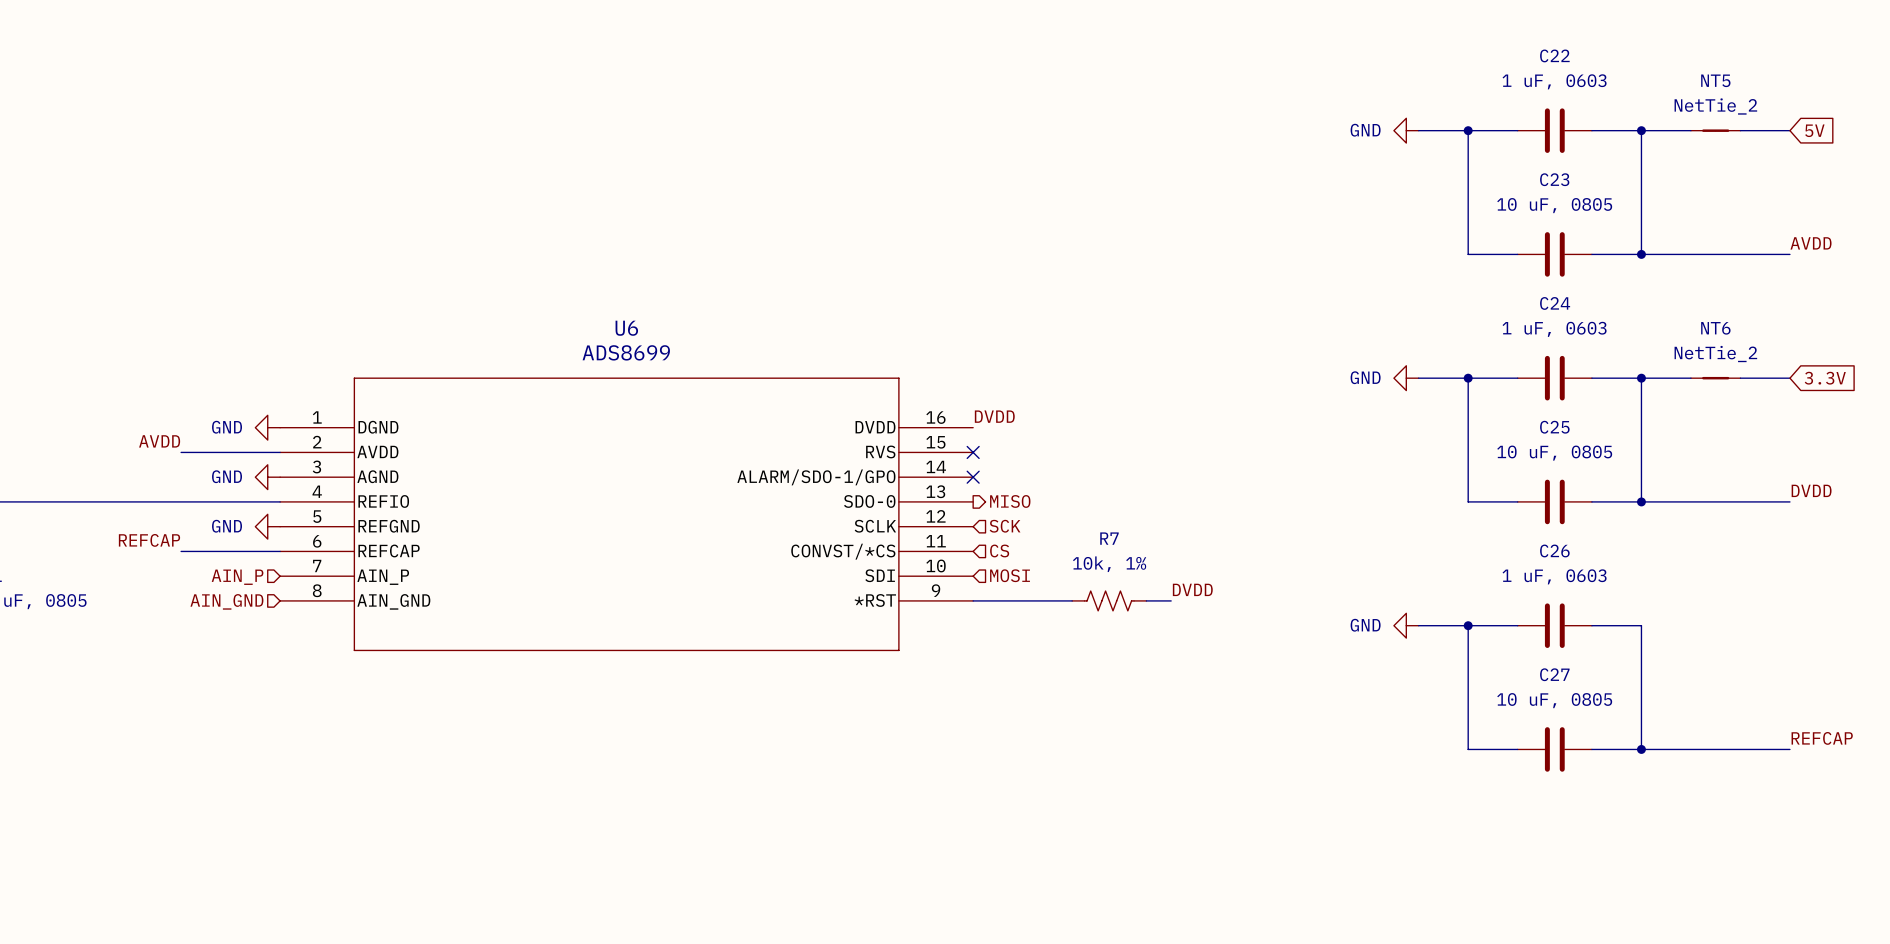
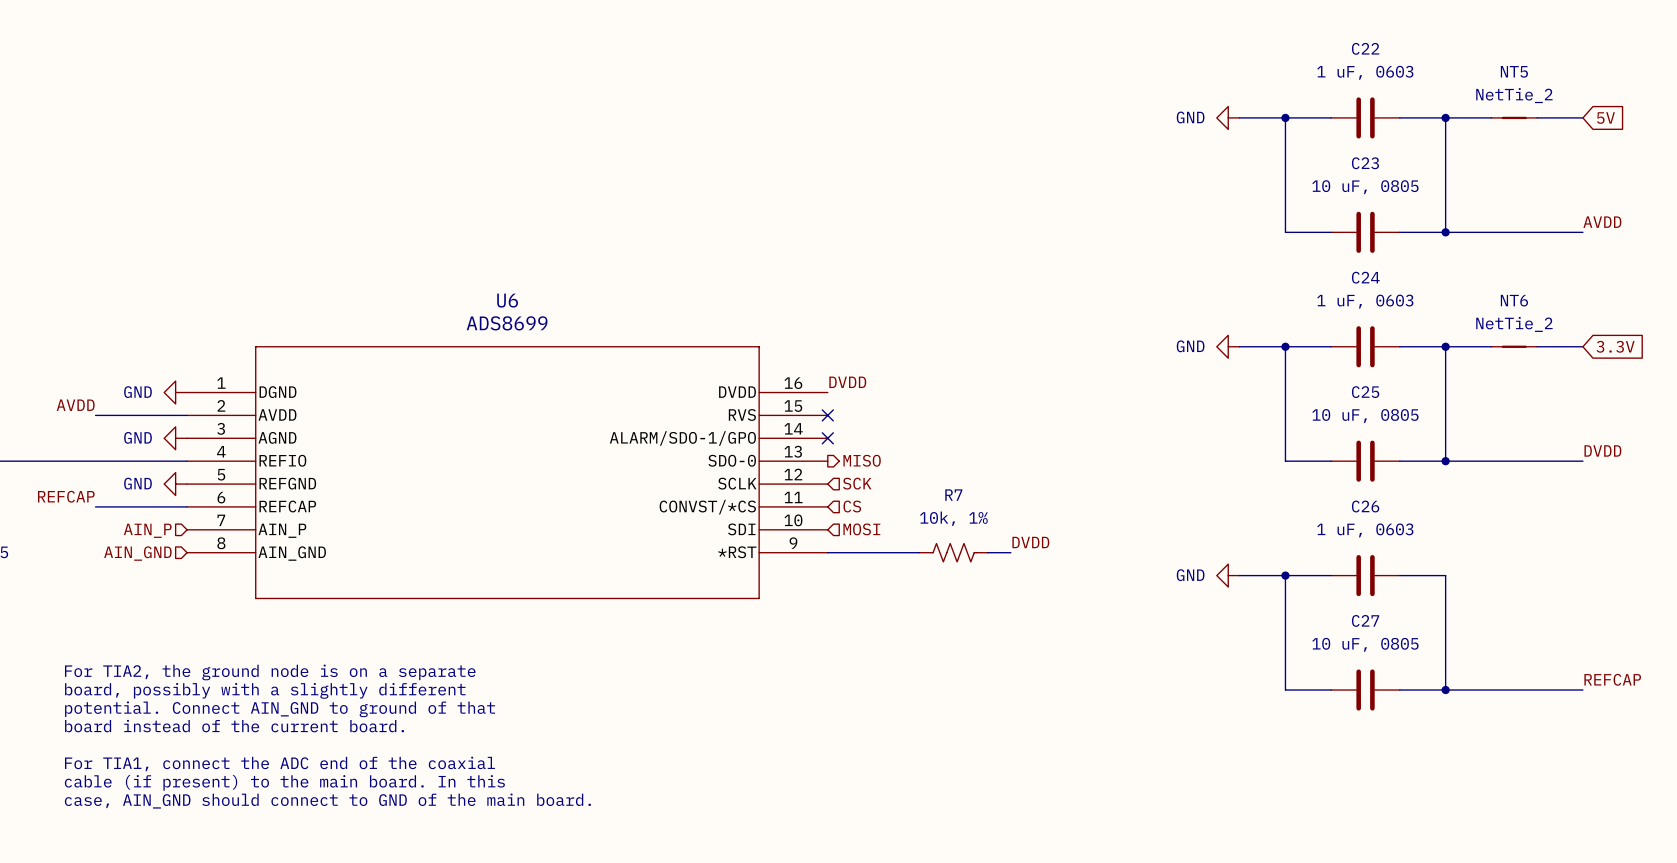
text: none -> For TIA2, the ground node is on a separate (270, 672)
text: none -> board, possibly with a slightly different (265, 690)
text: none -> potential. Connect AIN_GND to ground of that (280, 709)
text: none -> board instead of the current board. (234, 726)
text: none -> For TIA1, connect the ADC end of the coaxial (279, 763)
text: none -> cable (if present) to the main board. In this (284, 782)
text: none -> case, AIN_GND should connect to GND of the main board. (327, 801)

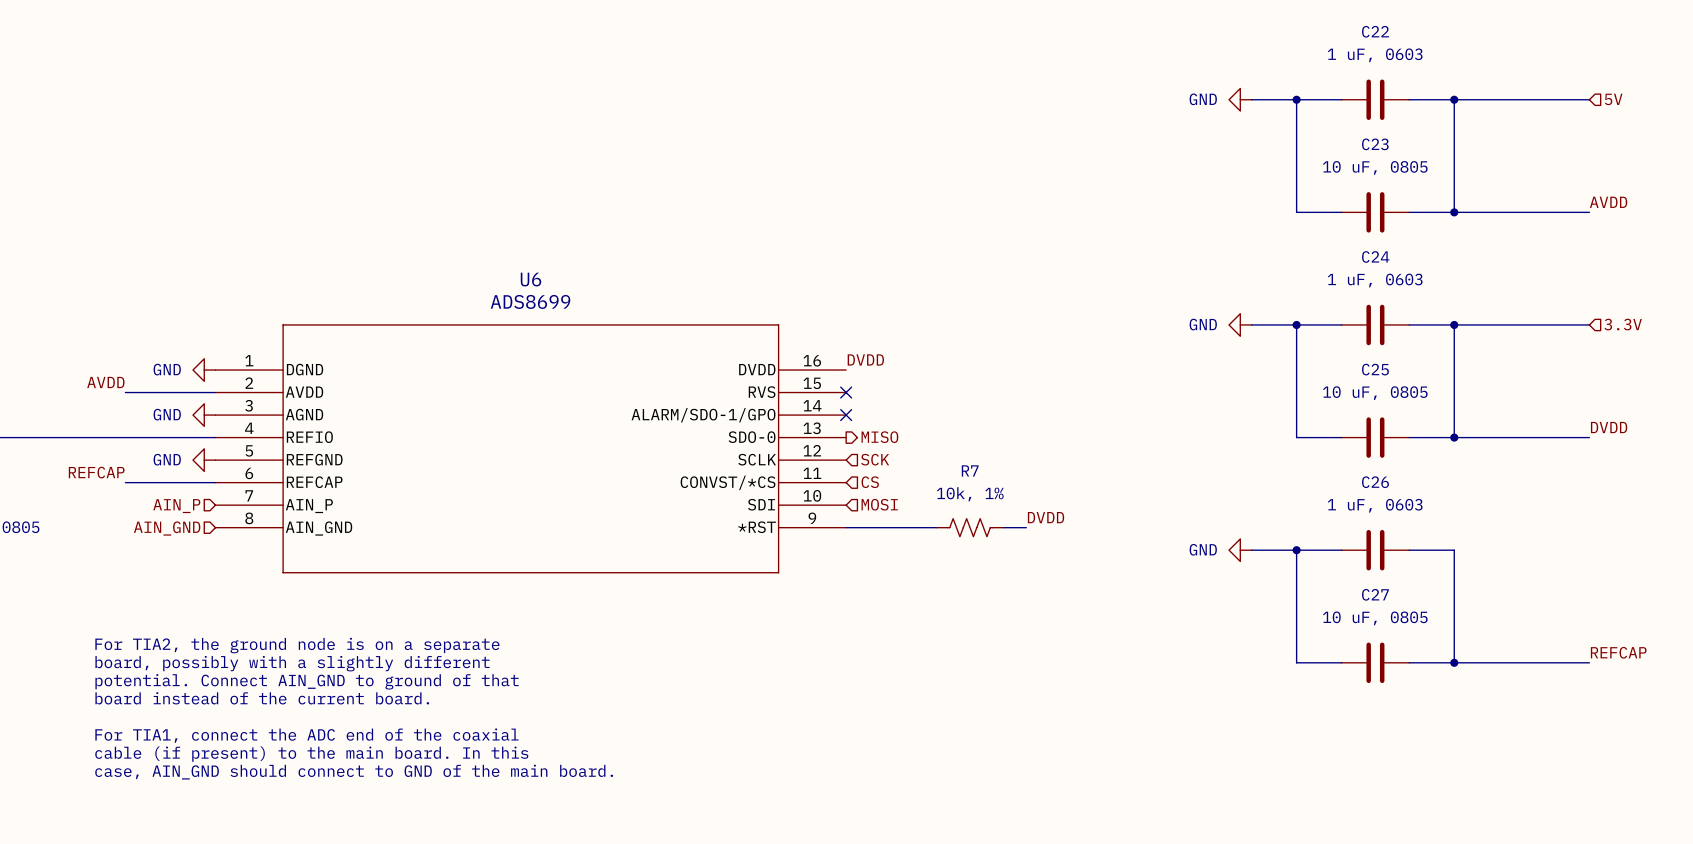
NT5: NetTie_2 (1514, 117) -> none
hierarchical label: none -> 5V (1613, 99)
global label: 5V (1605, 118) -> none
NT6: NetTie_2 (1514, 346) -> none
global label: 3.3V (1615, 346) -> none
hierarchical label: none -> 3.3V (1623, 324)

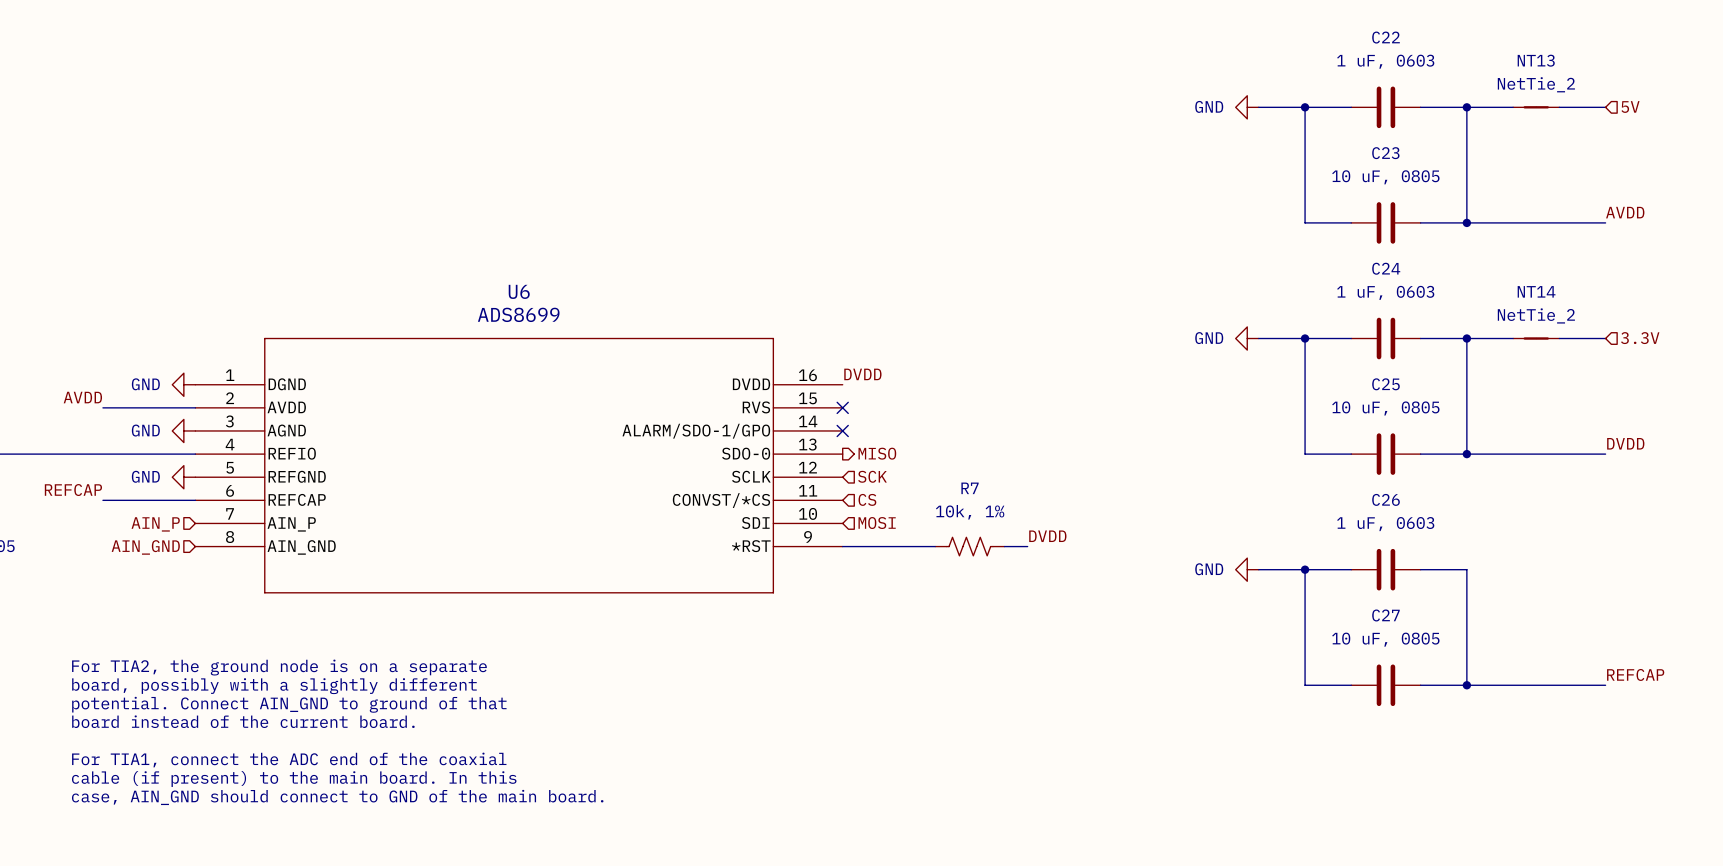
NT13: none -> NetTie_2 (1536, 107)
NT14: none -> NetTie_2 (1536, 338)

